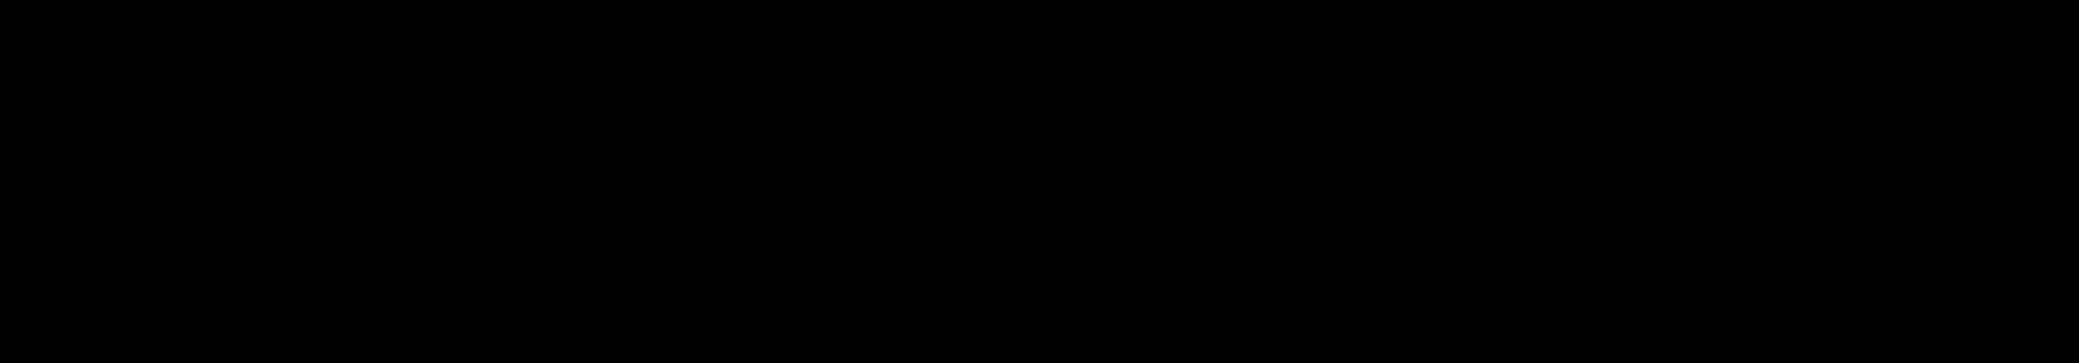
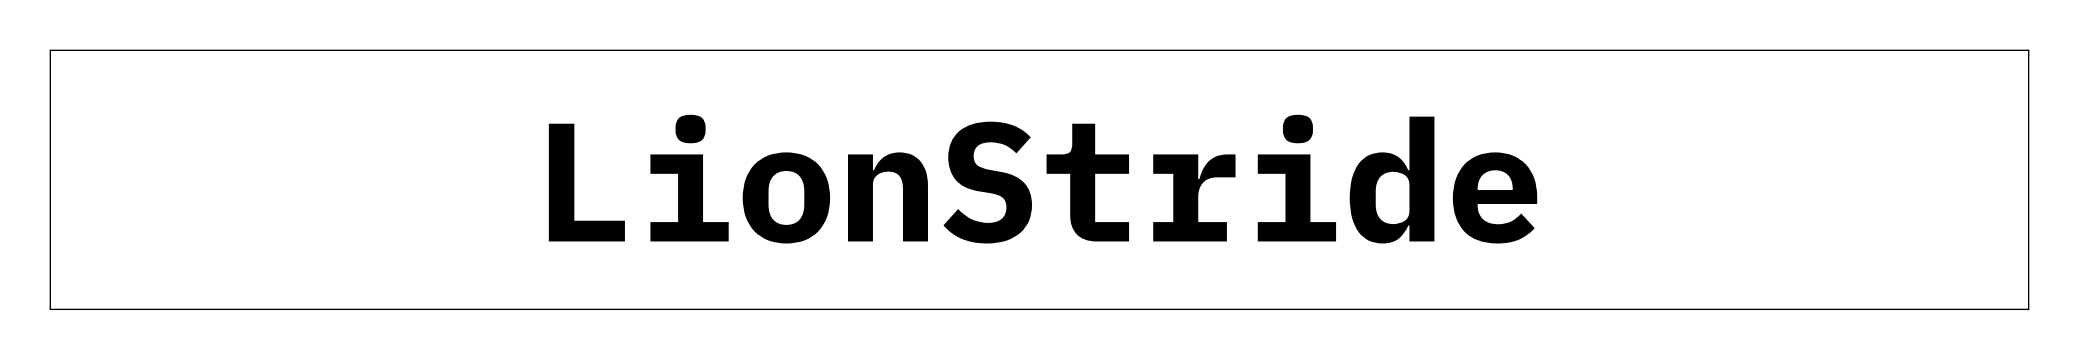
line: none -> (50, 50) (2028, 50) (2028, 309) (50, 309) (50, 50)
text: none -> LionStride (1043, 179)

